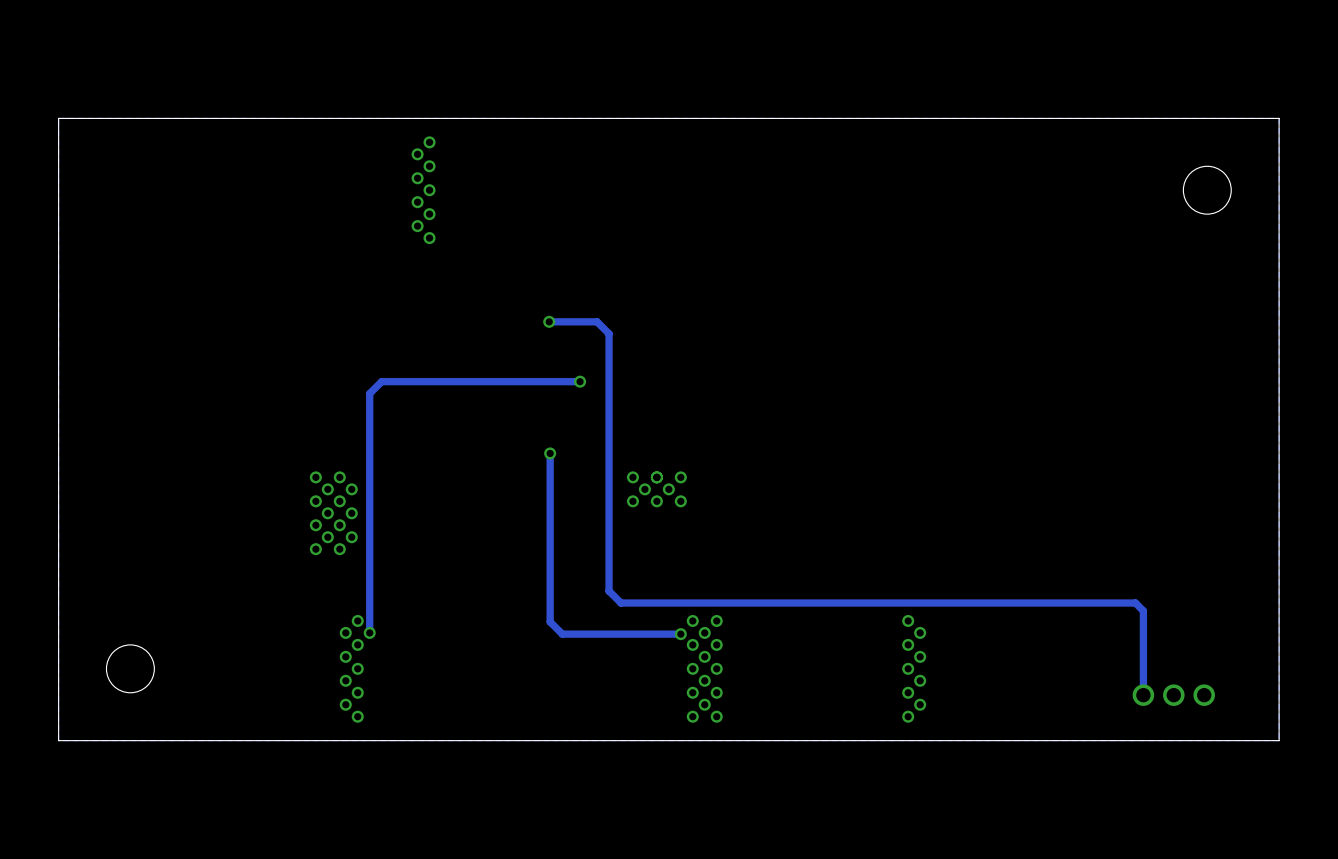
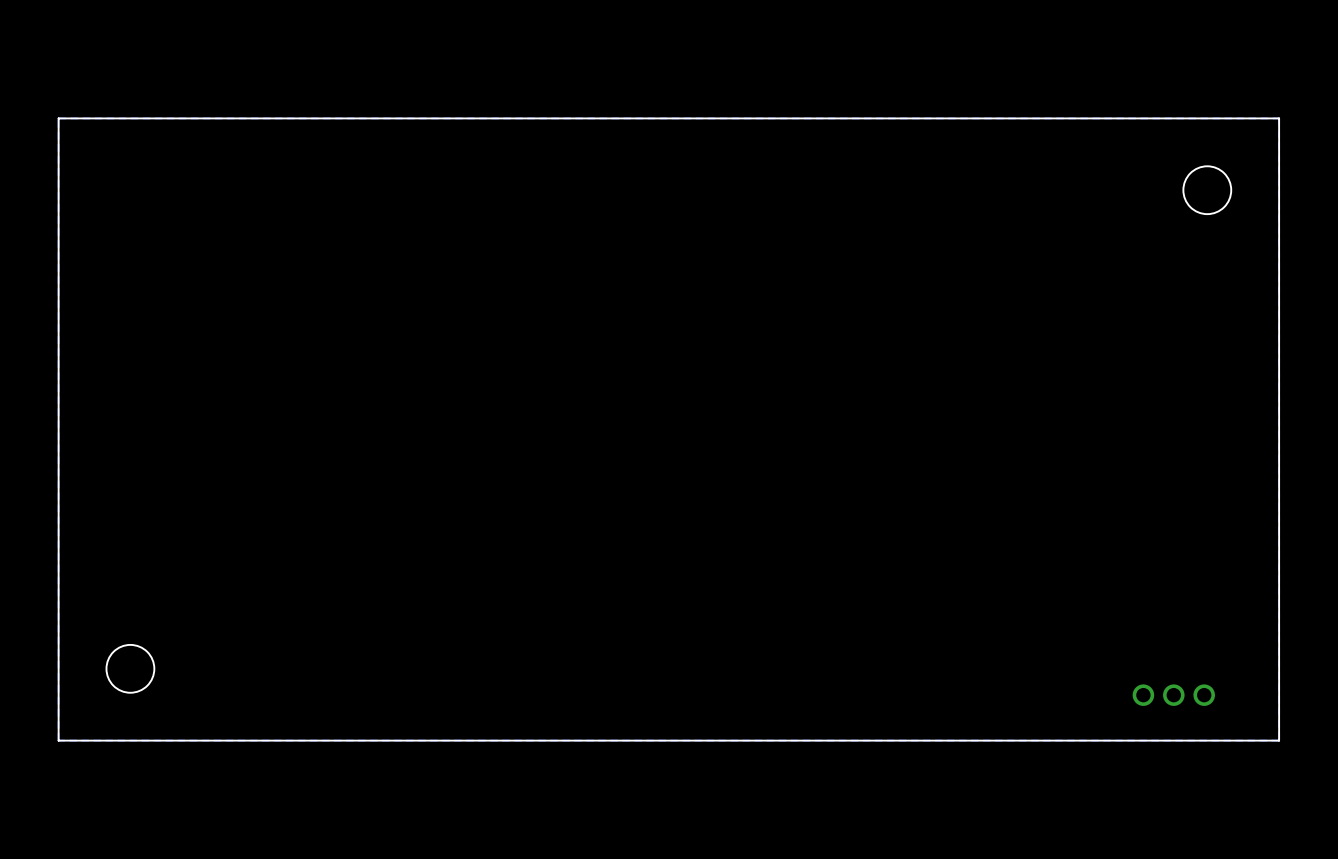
via: (429, 142) -> none
via: (417, 154) -> none
via: (429, 166) -> none
via: (417, 178) -> none
via: (429, 190) -> none
via: (417, 202) -> none
via: (429, 214) -> none
via: (417, 226) -> none
via: (429, 238) -> none
track: (549, 321) (597, 321) (609, 333) (609, 591) (621, 603) (1135, 603) (1143, 610) (1143, 695) -> none
via: (549, 321) -> none
track: (580, 381) (381, 381) (369, 393) (369, 632) -> none
via: (580, 381) -> none
track: (550, 453) (550, 621) (562, 634) (680, 634) -> none
via: (550, 453) -> none
via: (315, 477) -> none
via: (339, 477) -> none
via: (632, 477) -> none
via: (656, 477) -> none
via: (680, 477) -> none
via: (327, 489) -> none
via: (351, 489) -> none
via: (644, 489) -> none
via: (668, 489) -> none
via: (315, 501) -> none
via: (339, 501) -> none
via: (632, 501) -> none
via: (656, 501) -> none
via: (680, 501) -> none
via: (327, 513) -> none
via: (351, 513) -> none
via: (315, 525) -> none
via: (339, 525) -> none
via: (327, 537) -> none
via: (351, 537) -> none
via: (315, 549) -> none
via: (339, 549) -> none
via: (357, 620) -> none
via: (692, 620) -> none
via: (716, 620) -> none
via: (908, 620) -> none
via: (345, 632) -> none
via: (369, 632) -> none
via: (704, 632) -> none
via: (920, 632) -> none
via: (680, 634) -> none
via: (357, 644) -> none
via: (692, 644) -> none
via: (716, 644) -> none
via: (908, 644) -> none
via: (345, 656) -> none
via: (704, 656) -> none
via: (920, 656) -> none
via: (357, 668) -> none
via: (692, 668) -> none
via: (716, 668) -> none
via: (908, 668) -> none
via: (345, 680) -> none
via: (704, 680) -> none
via: (920, 680) -> none
via: (357, 692) -> none
via: (692, 692) -> none
via: (716, 692) -> none
via: (908, 692) -> none
via: (345, 704) -> none
via: (704, 704) -> none
via: (920, 704) -> none
via: (357, 716) -> none
via: (692, 716) -> none
via: (716, 716) -> none
via: (908, 716) -> none

